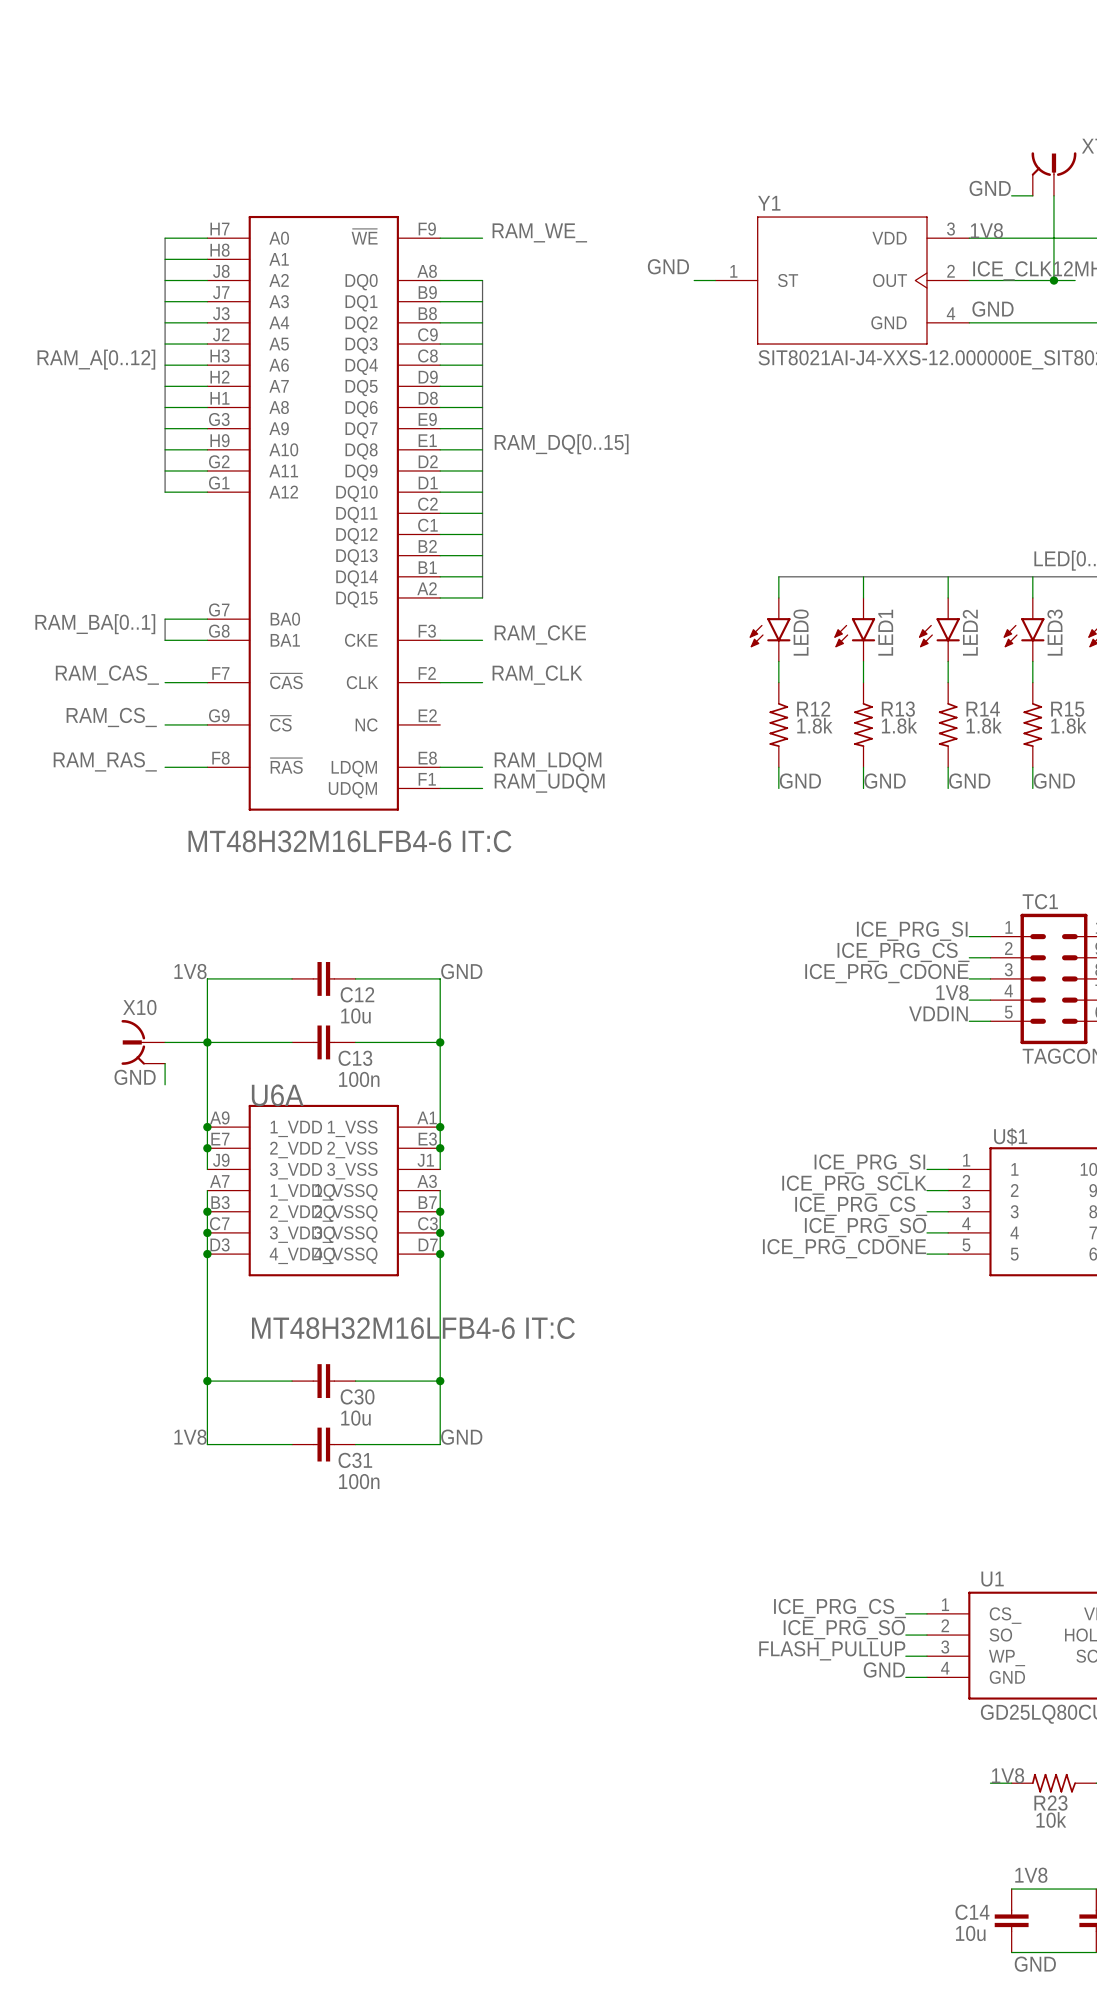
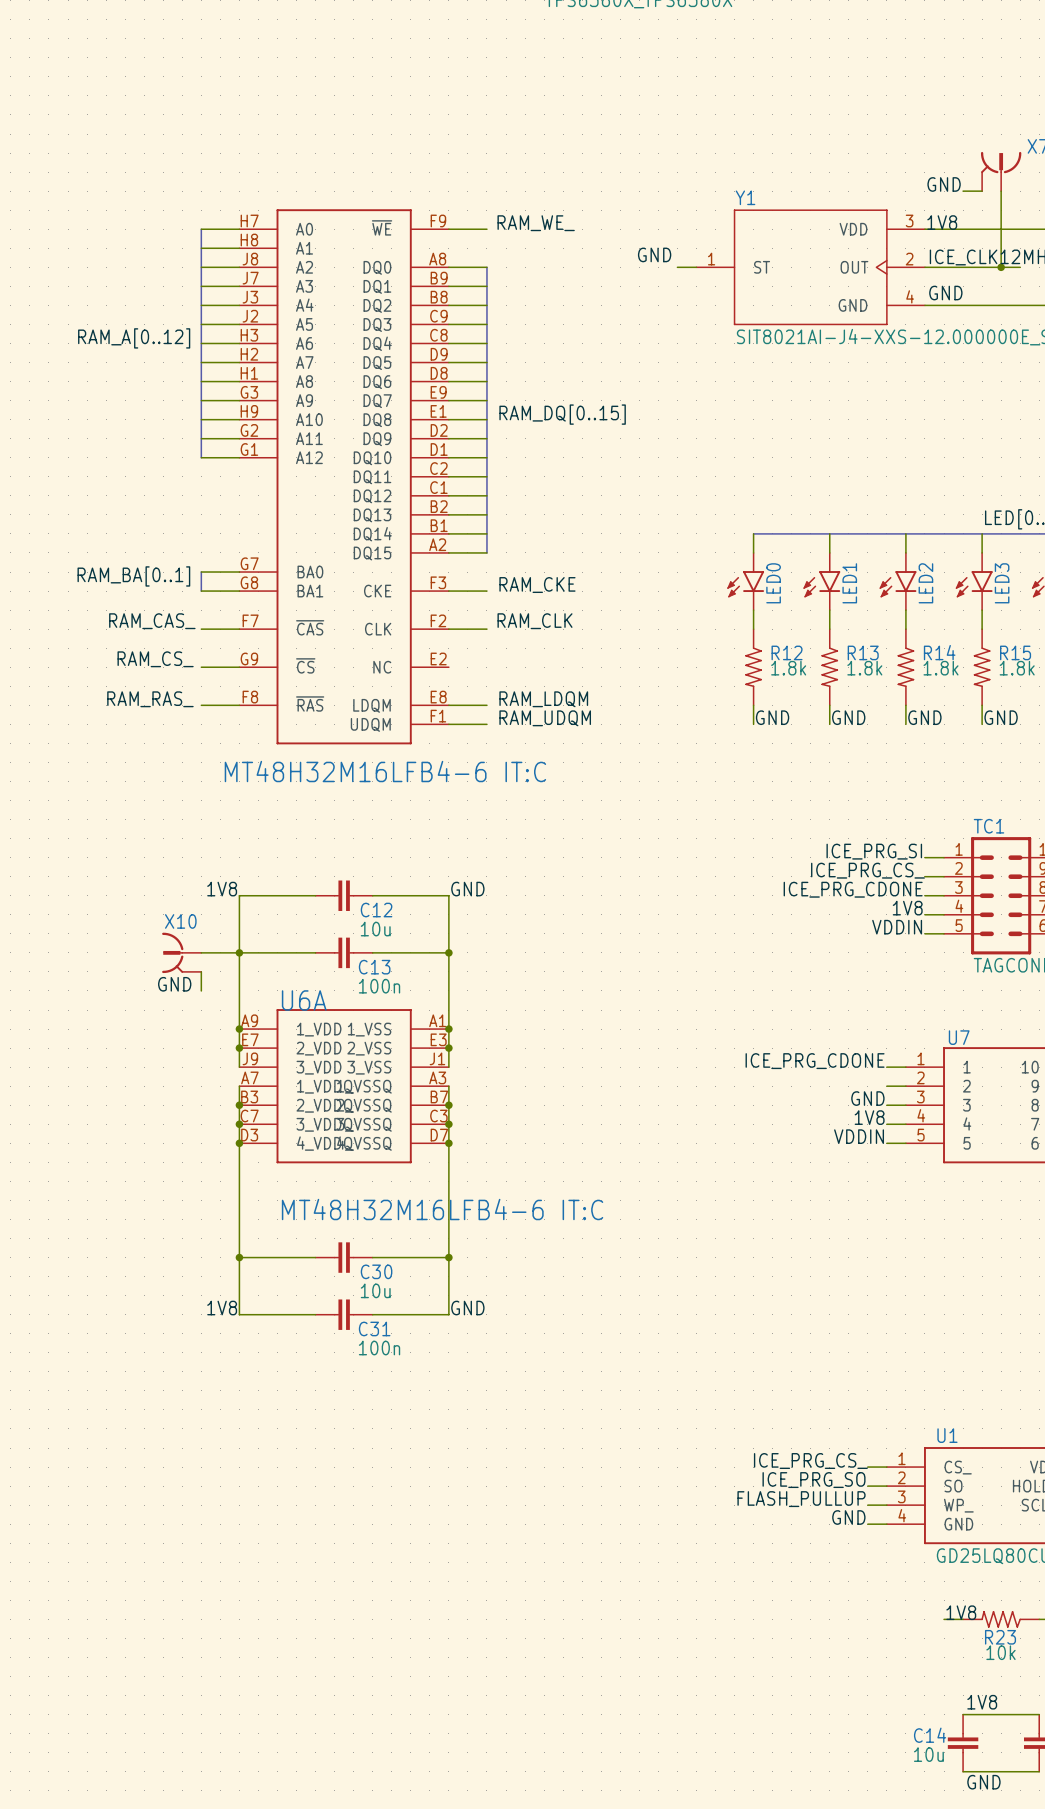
U$1 name: U$1 (1010, 1136) -> U7 (959, 1037)
label: ICE_PRG_SI (869, 1164) -> ICE_PRG_CDONE (815, 1061)
label: ICE_PRG_SCLK (854, 1185) -> none
label: ICE_PRG_CS_ (861, 1206) -> GND (867, 1098)
label: ICE_PRG_SO (865, 1227) -> 1V8 (869, 1117)
label: ICE_PRG_CDONE (844, 1248) -> VDDIN (859, 1136)

